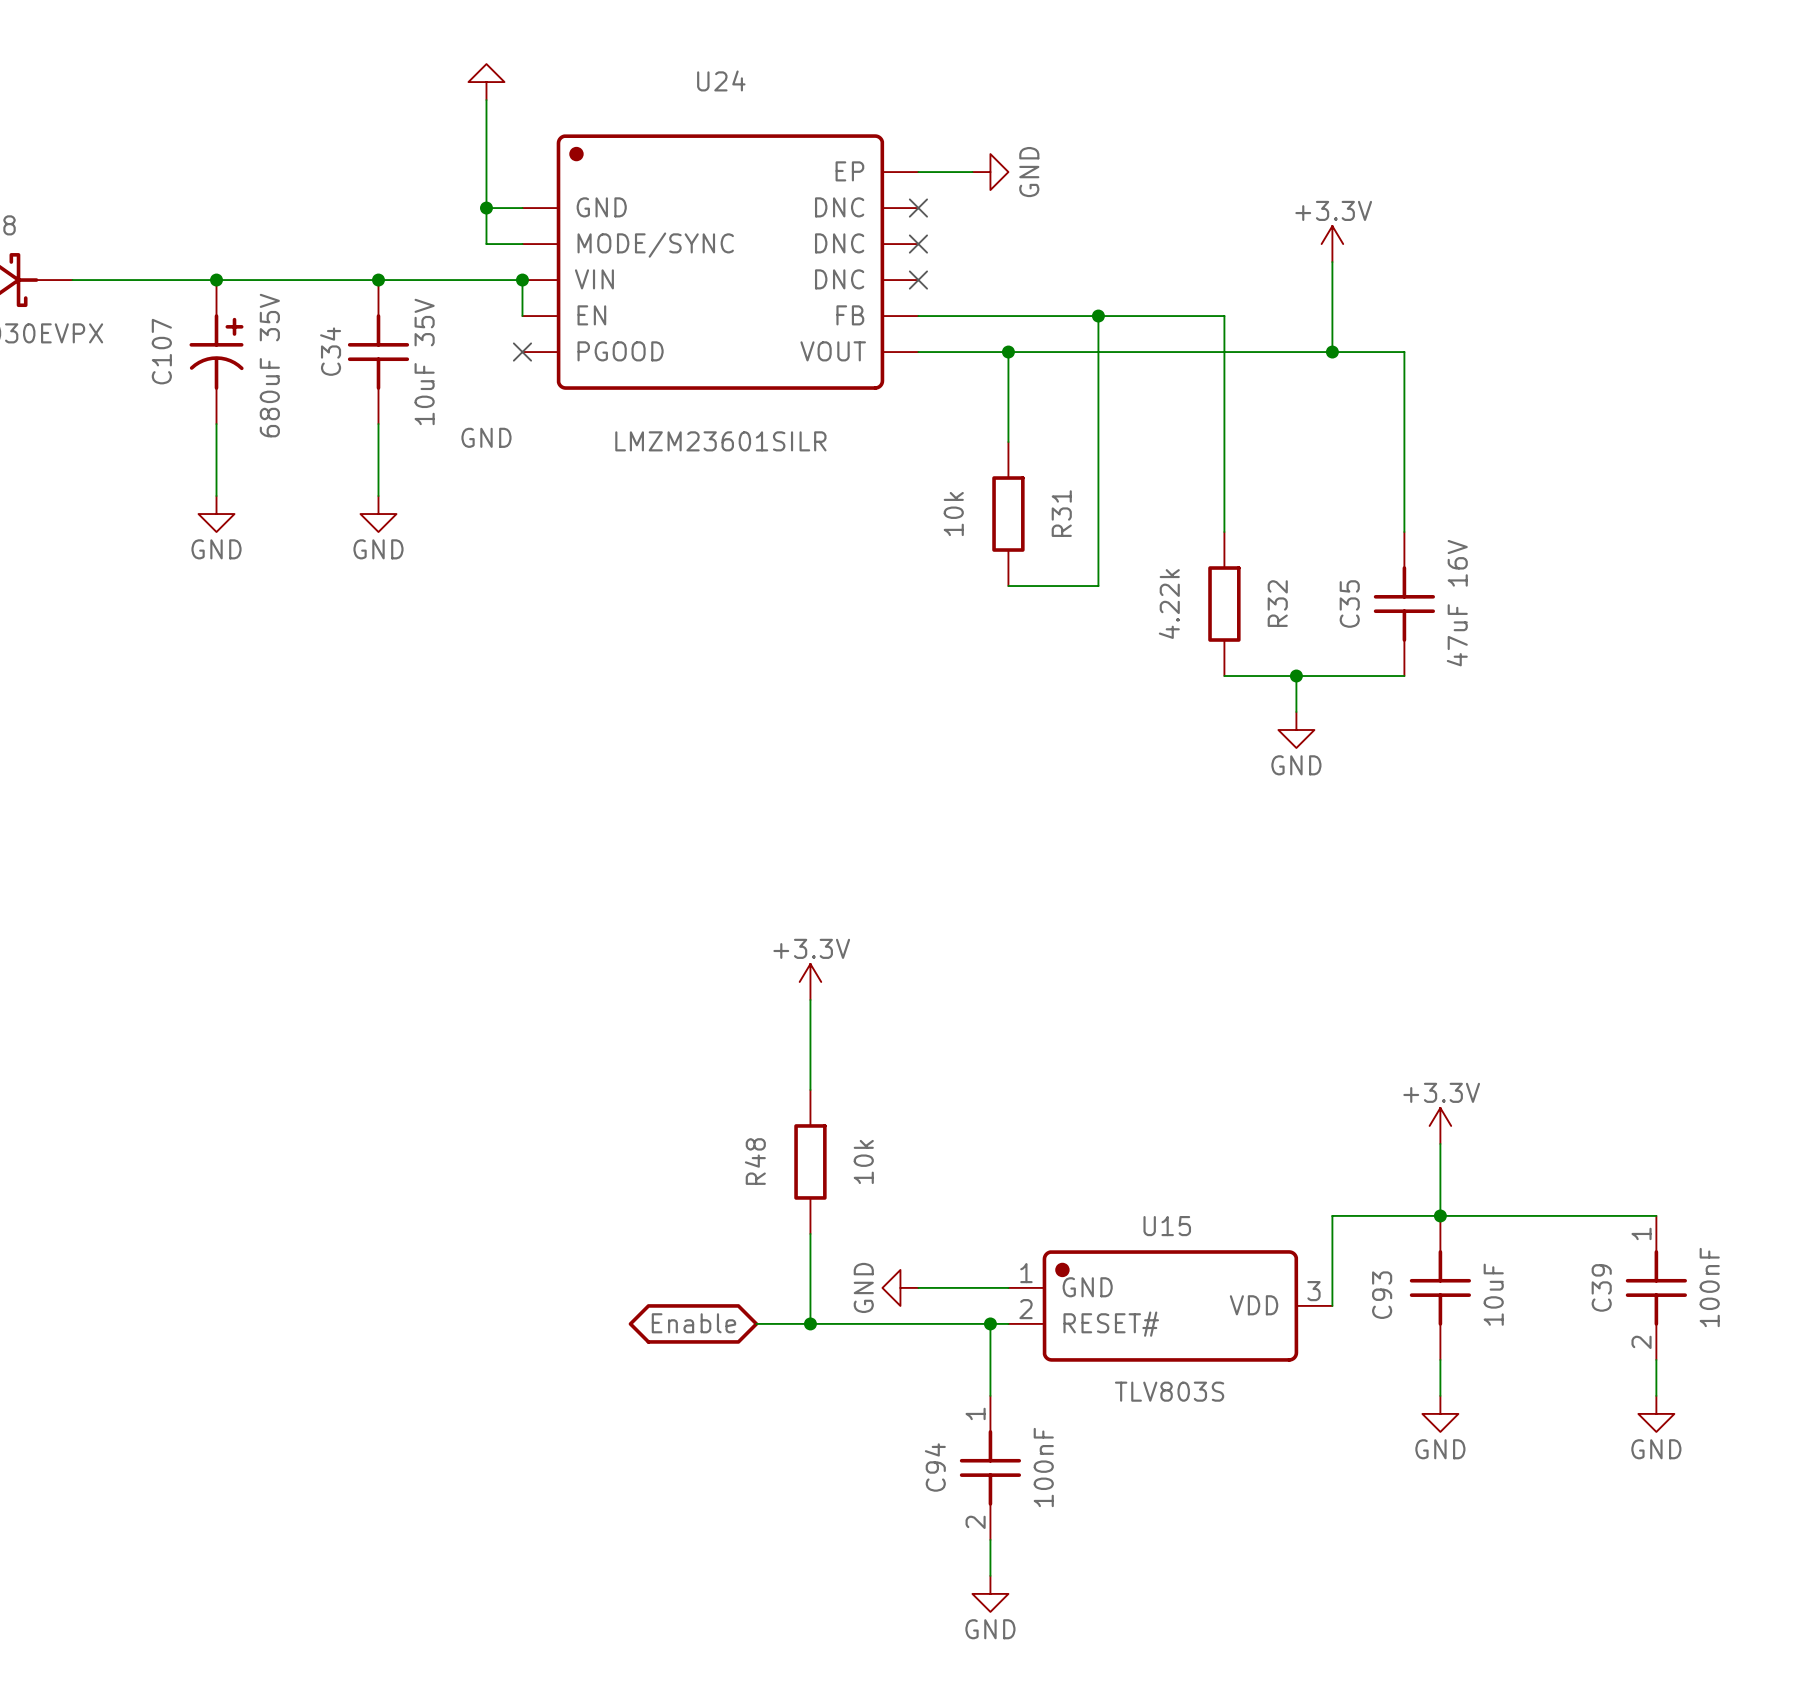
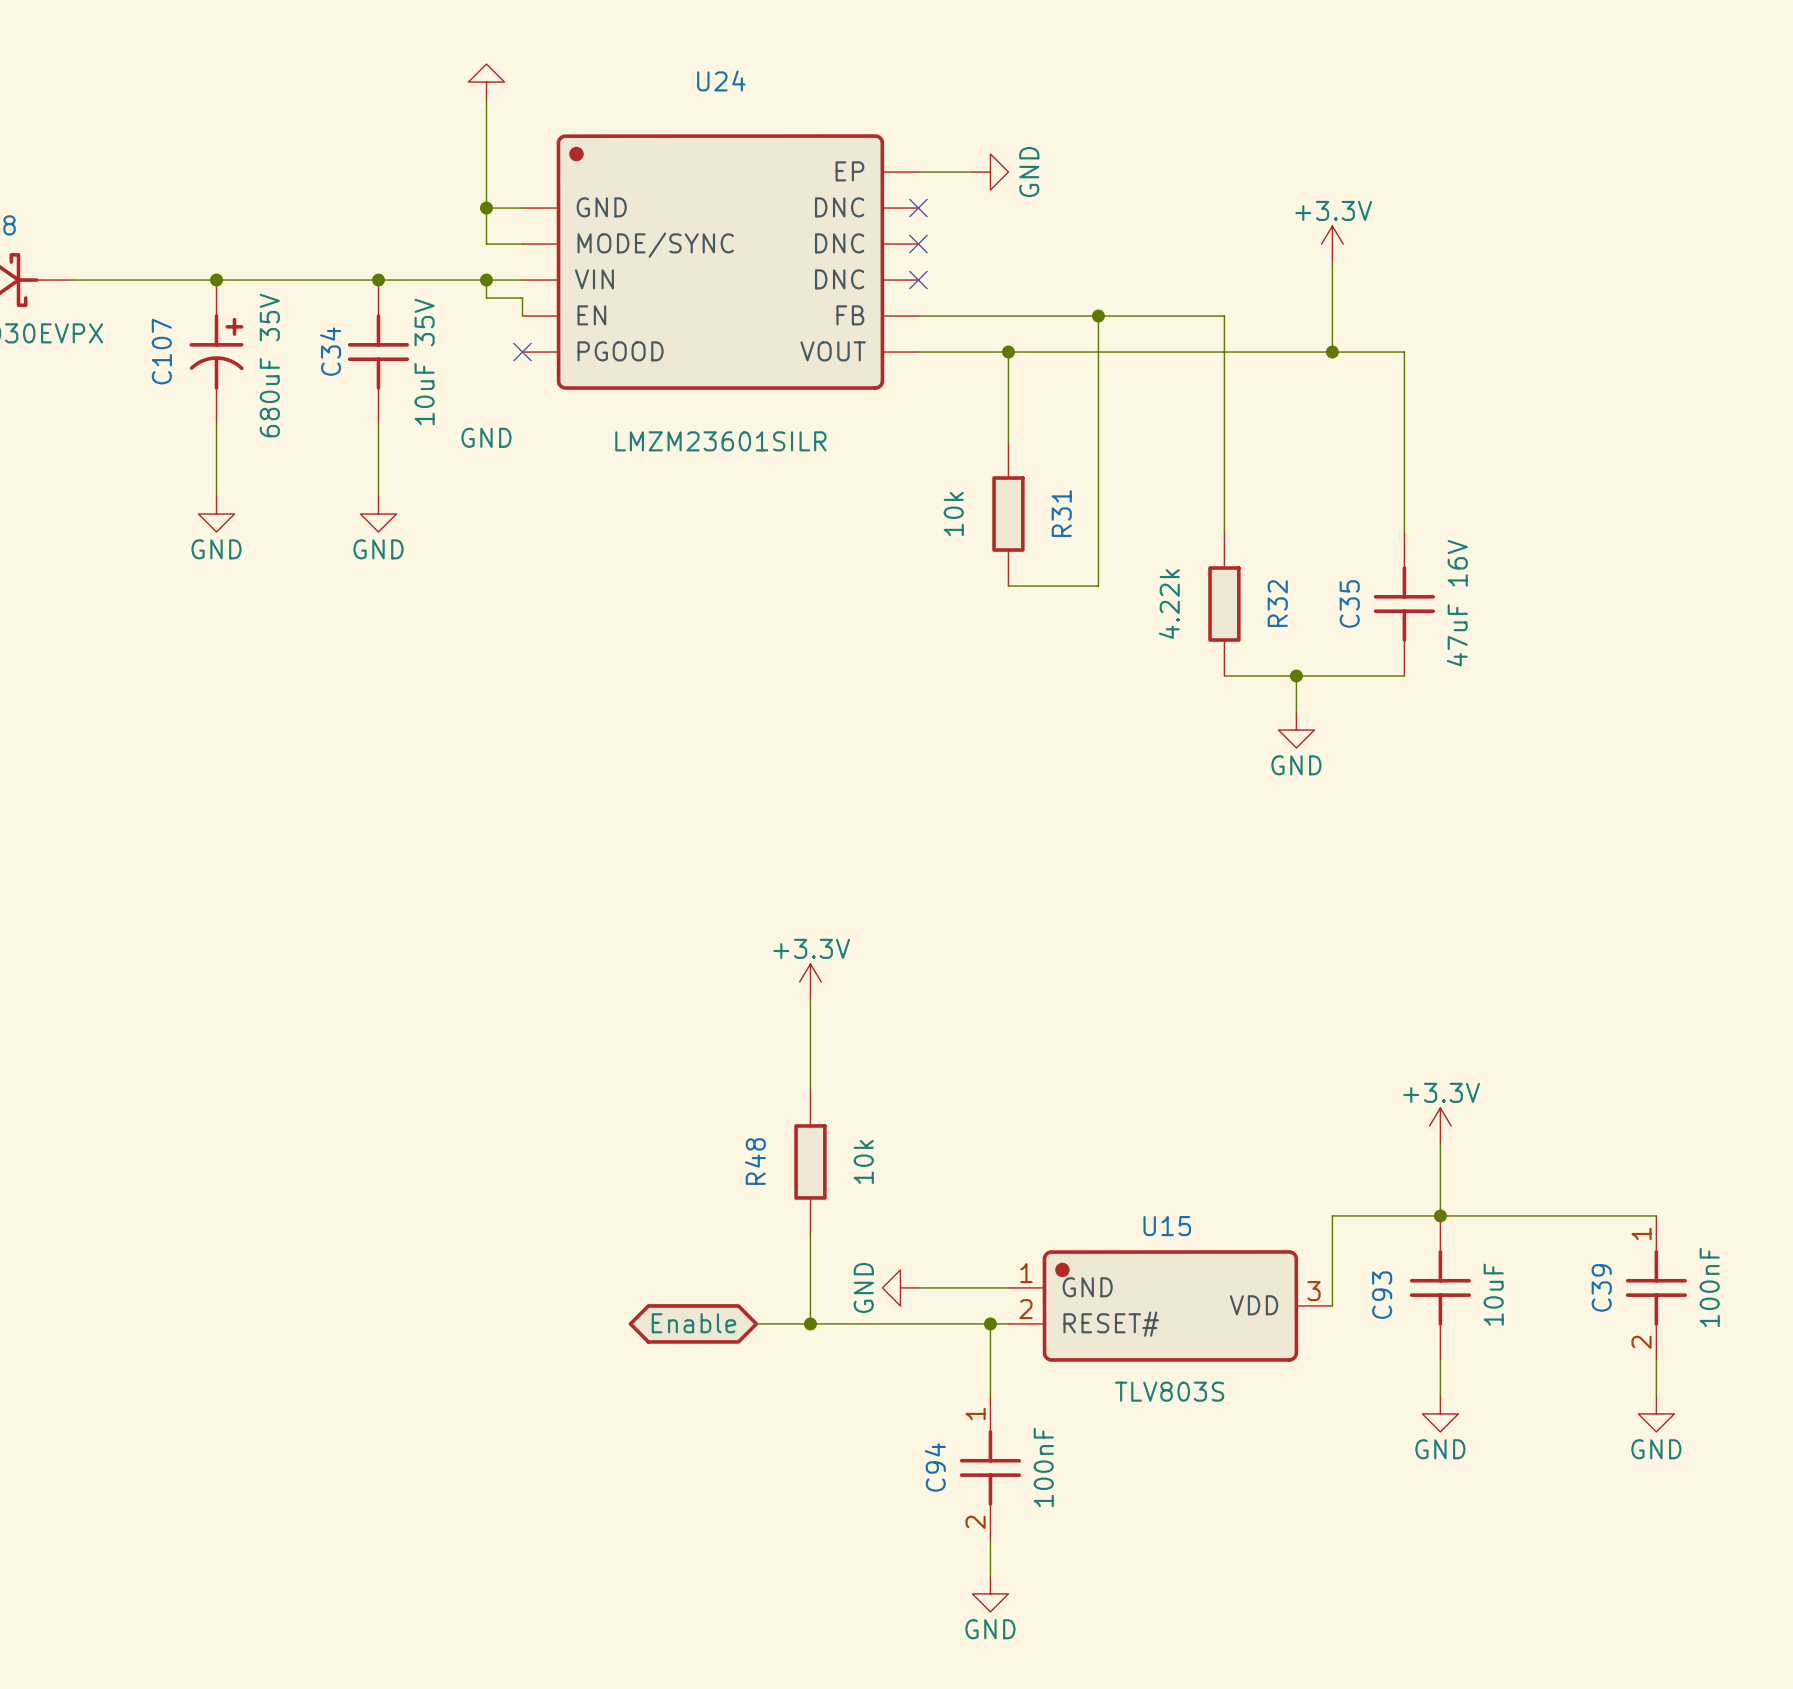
wire: (522, 280) (522, 298) -> (486, 280) (486, 298) (522, 298)
junction position: (522, 280) -> (486, 280)

